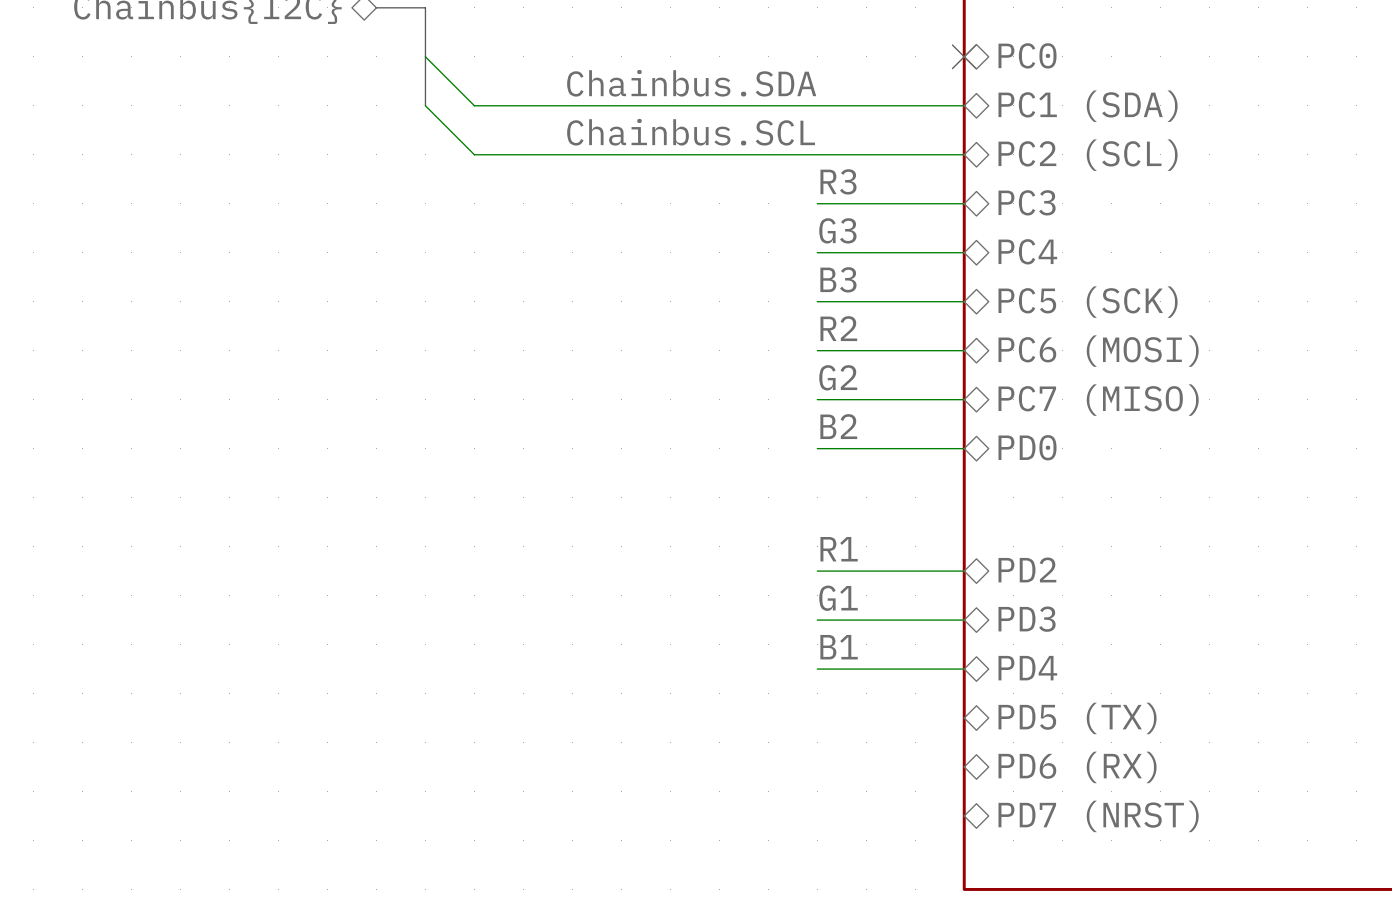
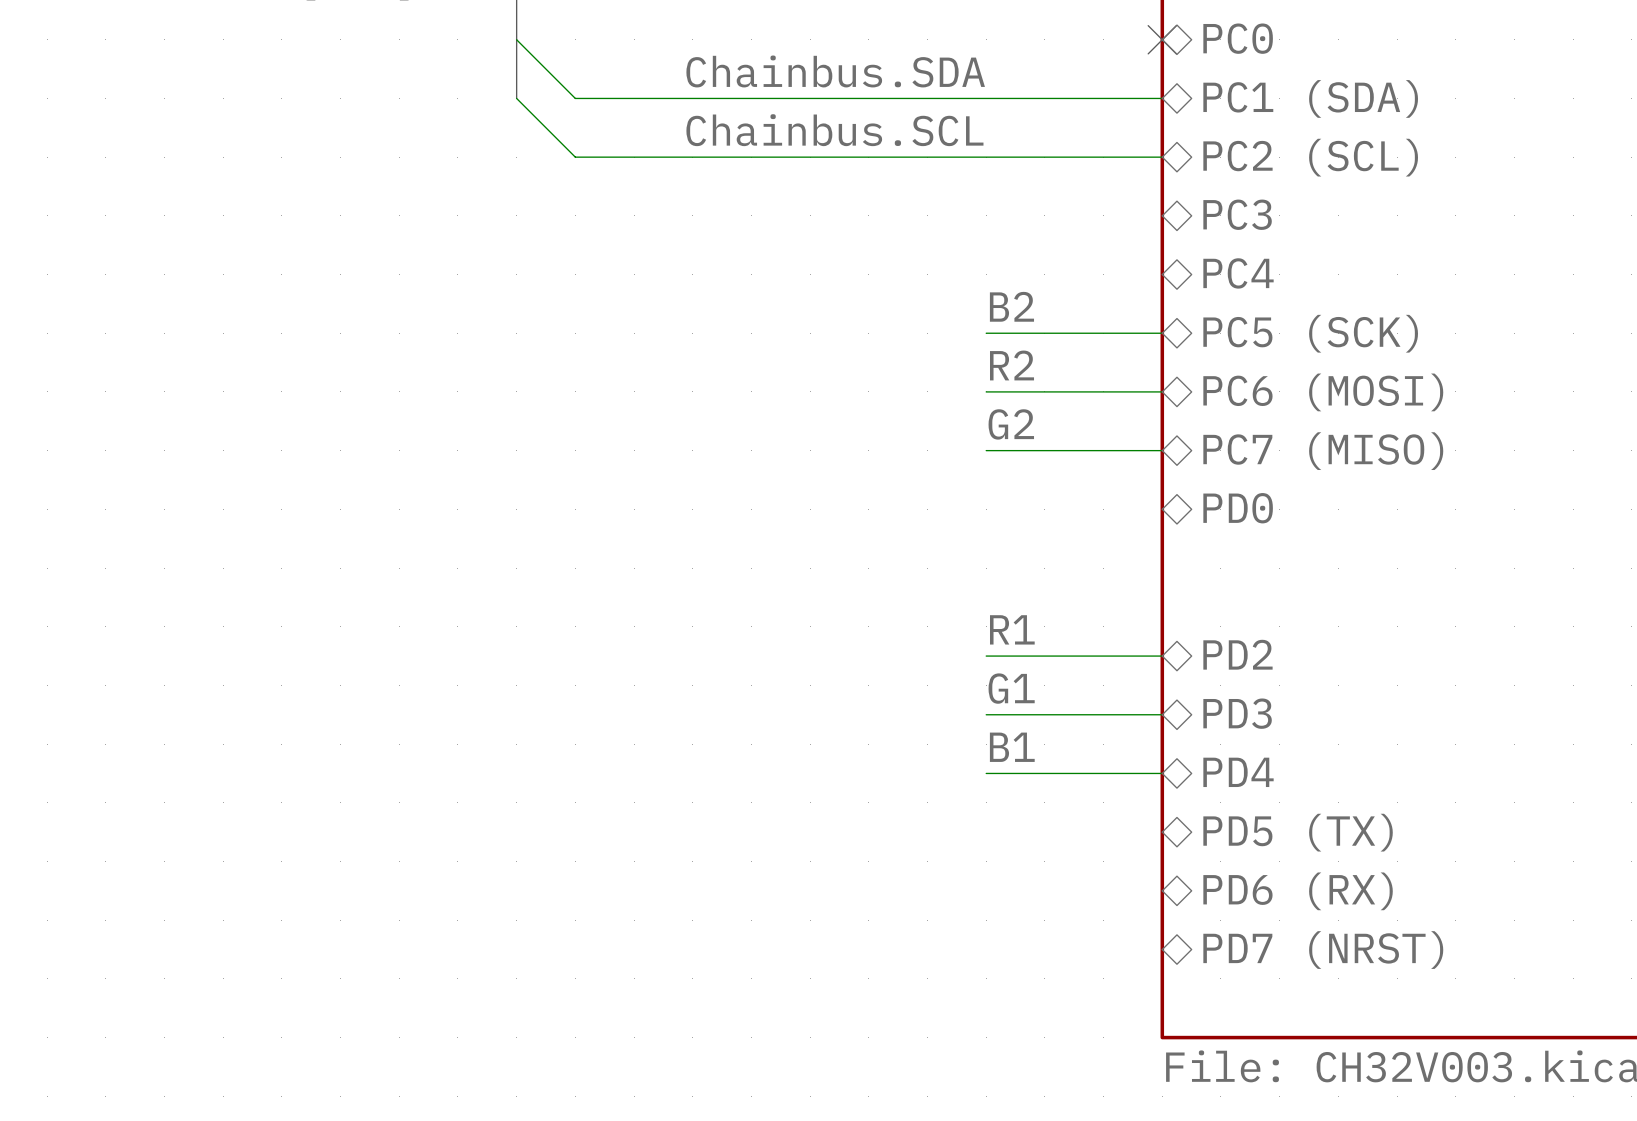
label: R3 (838, 181) -> none
wire: (817, 203) (964, 203) -> none
label: G3 (837, 230) -> none
wire: (817, 252) (964, 252) -> none
label: B3 (838, 279) -> B2 (1011, 306)
label: B2 (838, 426) -> none
wire: (817, 448) (964, 448) -> none

